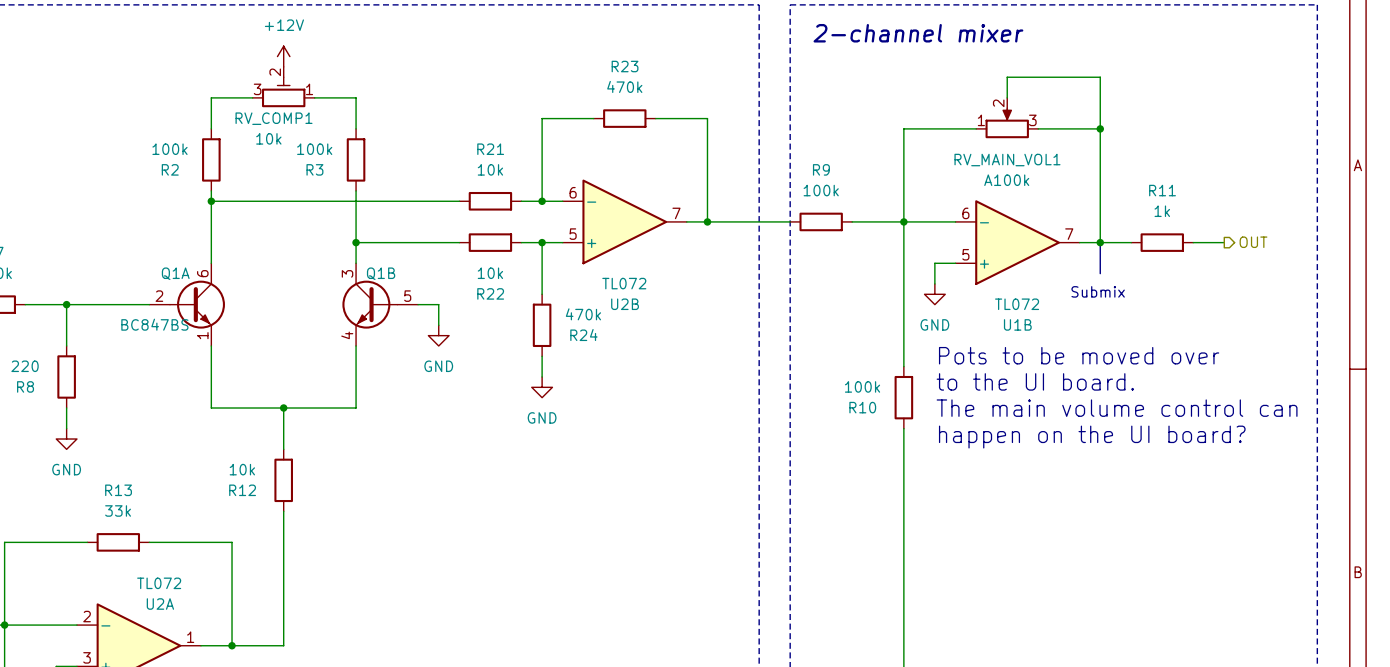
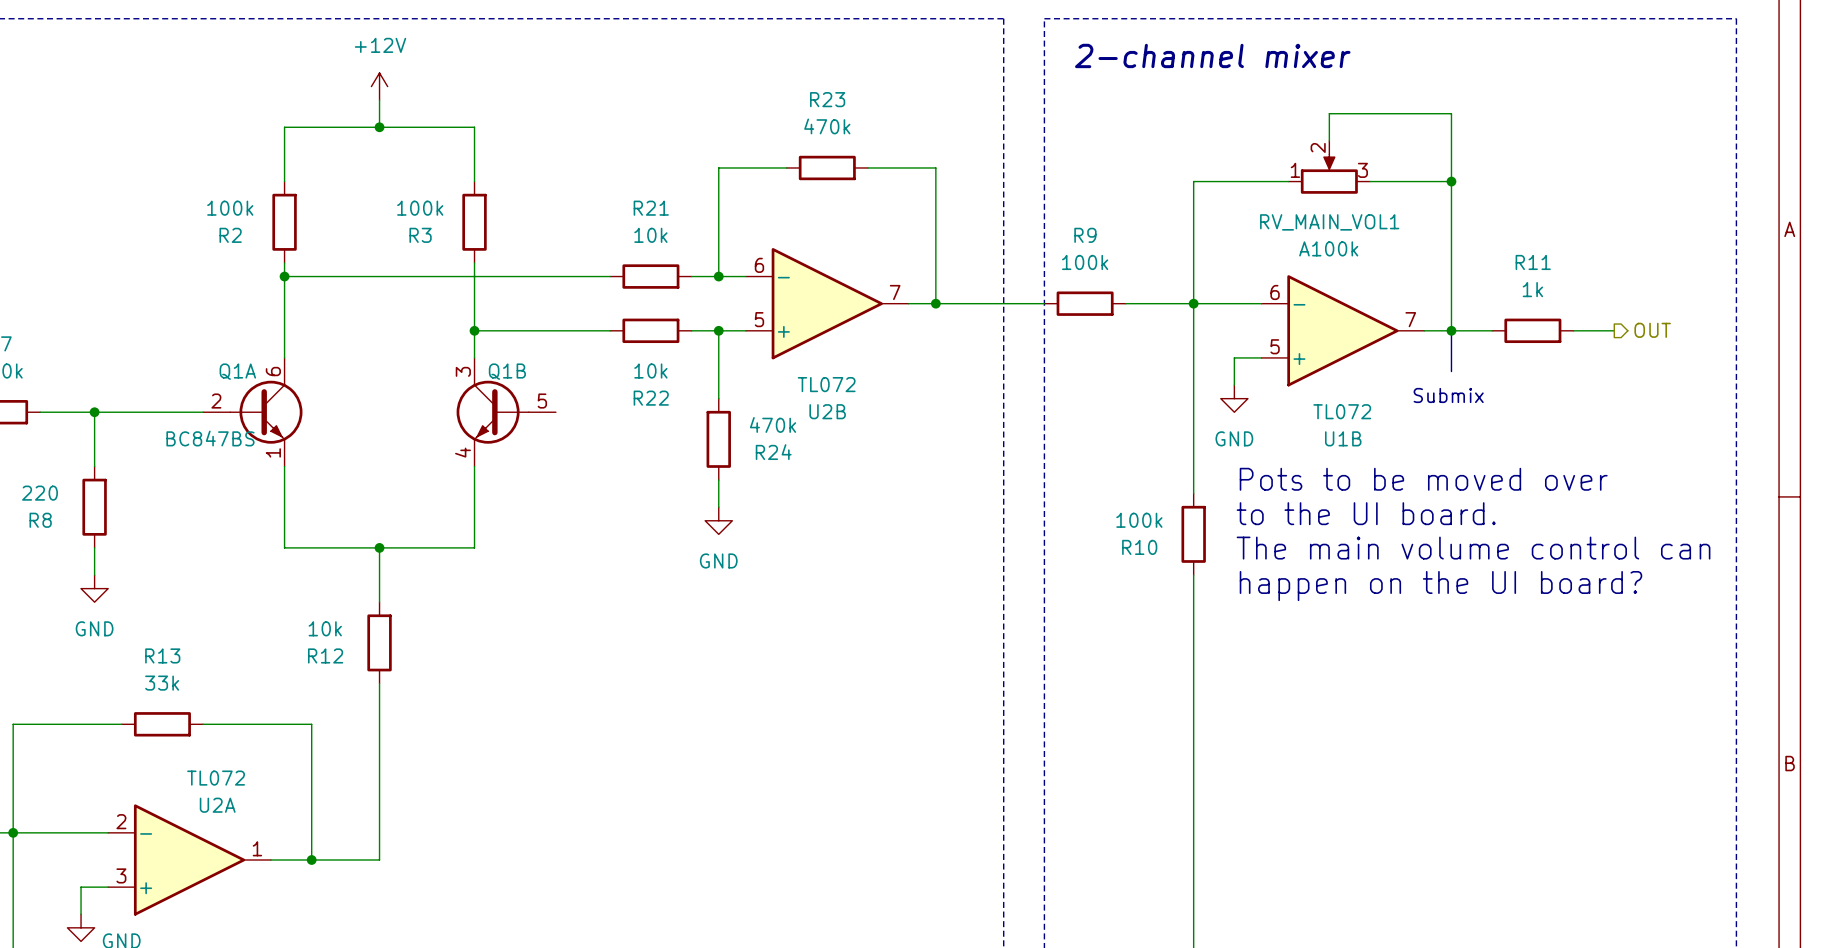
RV_COMP1: 10k (283, 87) -> none
junction: none -> (379, 127)
wire: (211, 97) (252, 97) -> none
wire: (314, 97) (356, 97) -> (284, 140) (284, 127) (474, 127) (474, 140)
wire: (418, 304) (438, 304) (438, 325) -> none
power symbol: GND (438, 335) -> none

